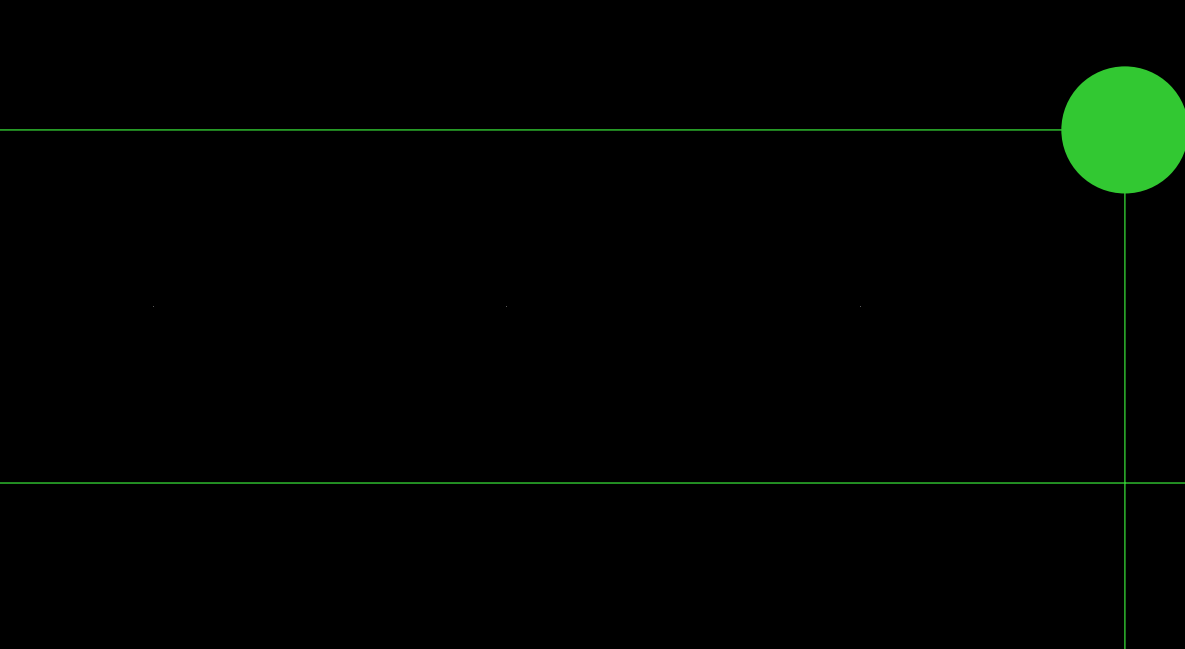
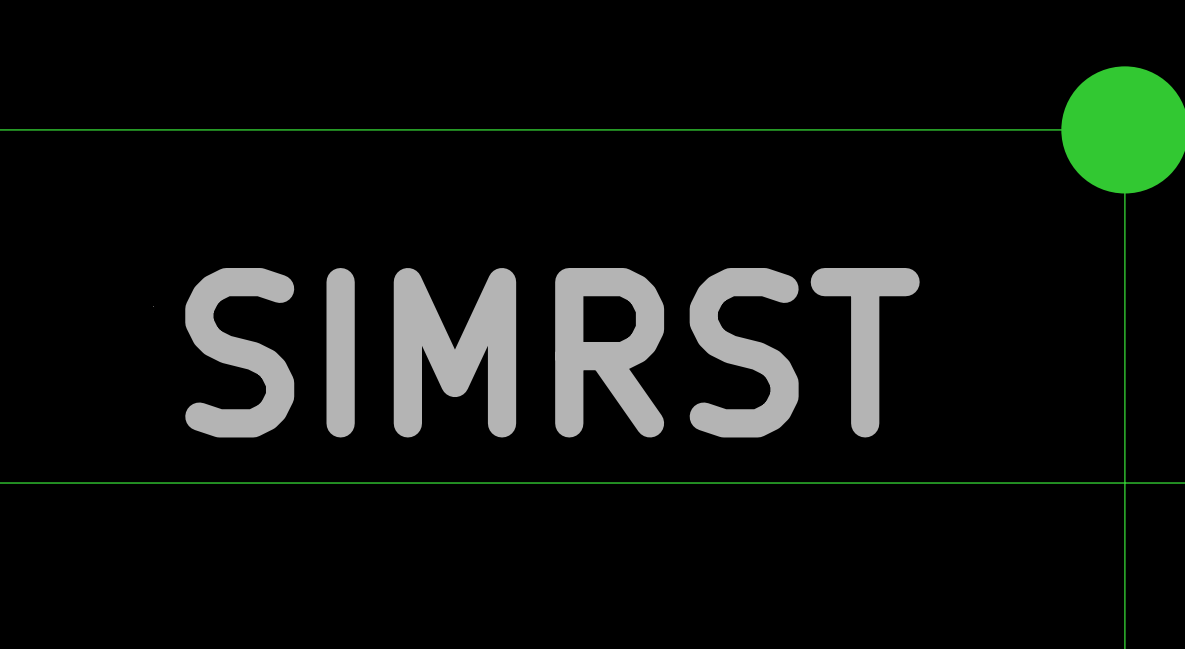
label: none -> SIMRST (552, 352)

